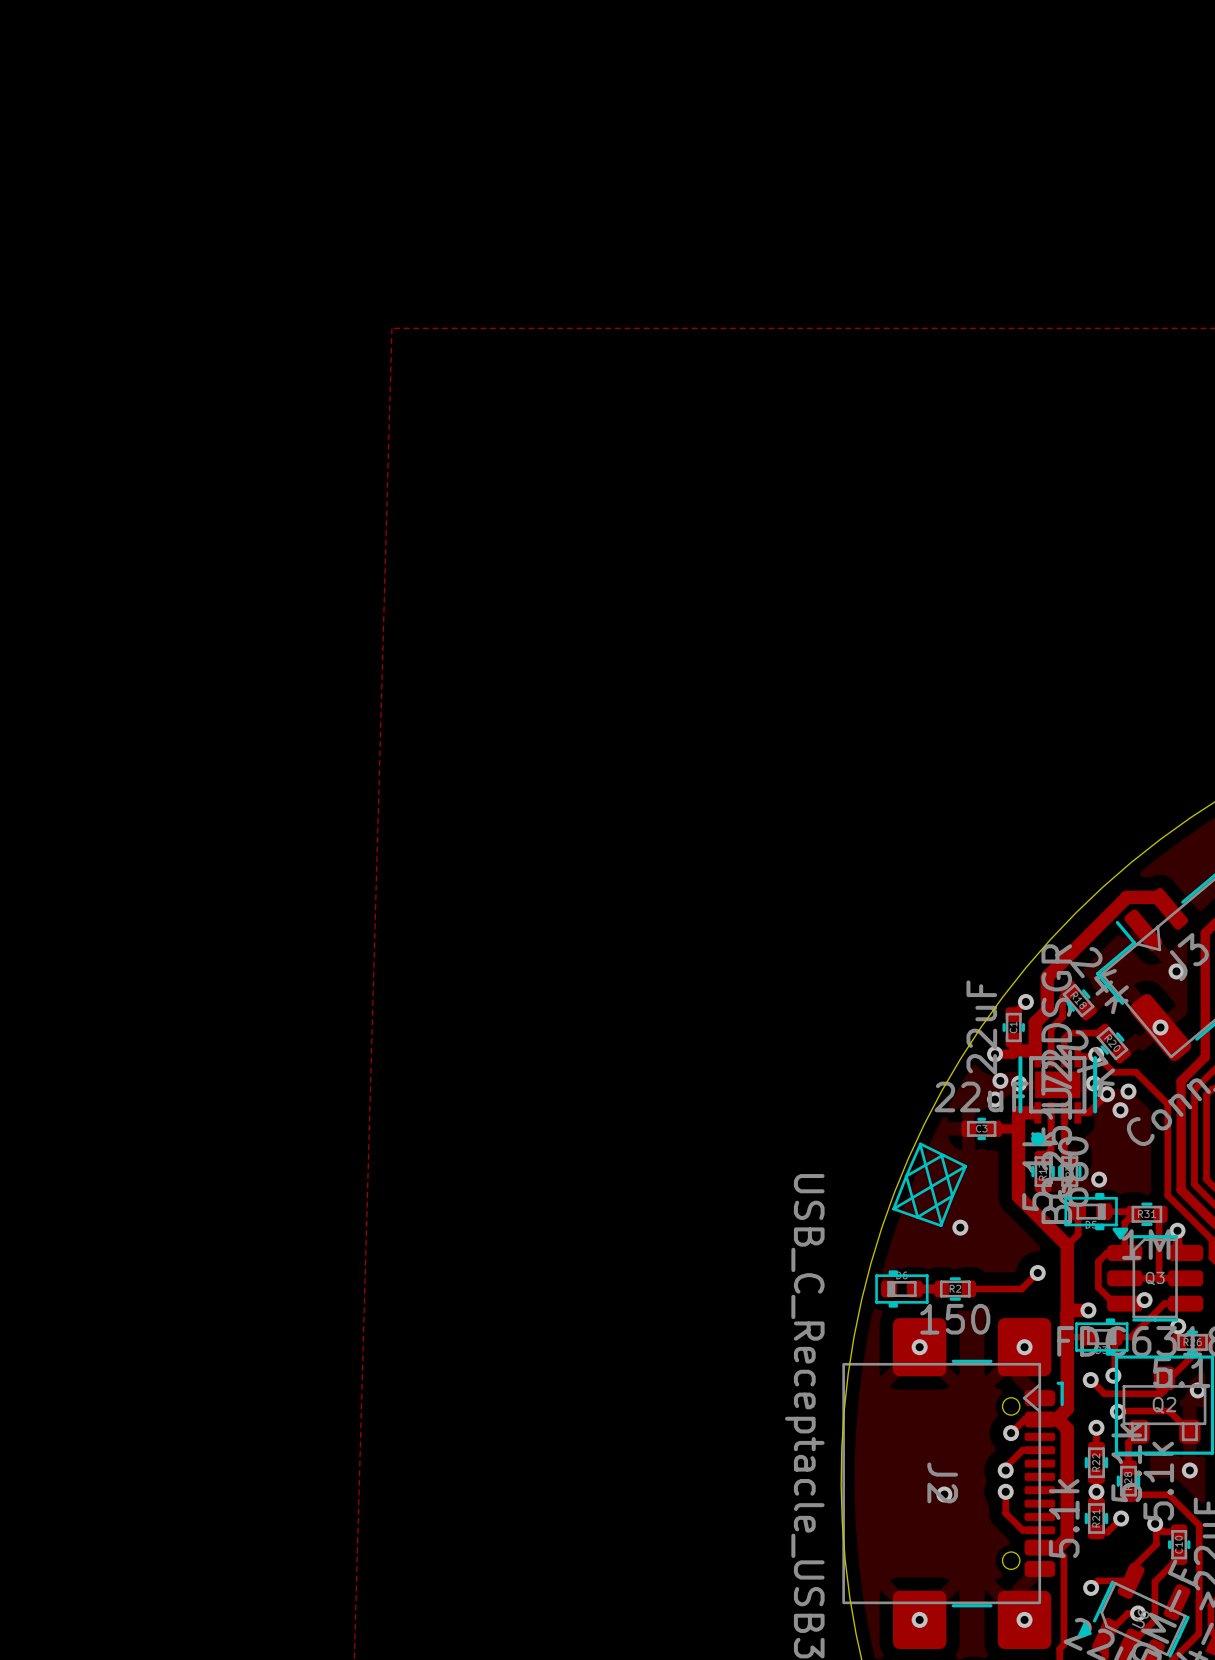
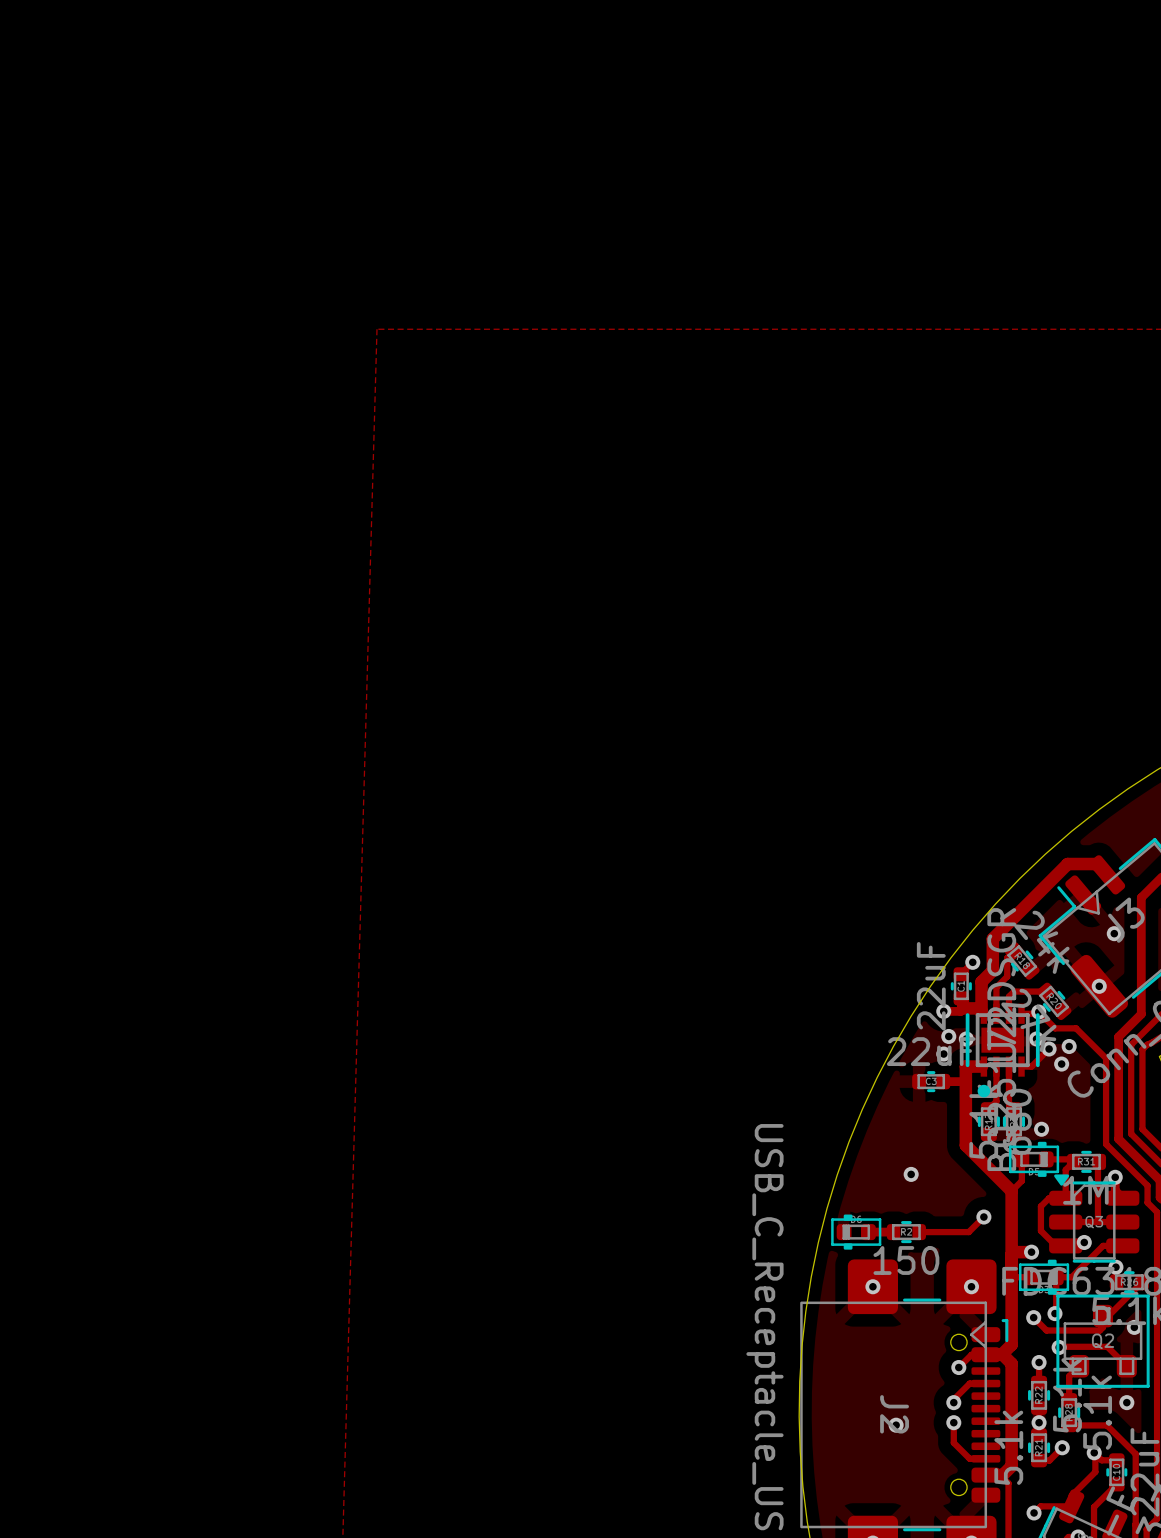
line: (920, 1144) (941, 1224) -> none
line: (941, 1155) (952, 1195) -> none
line: (943, 1155) (906, 1176) (917, 1216) -> none
line: (965, 1166) (920, 1143) (893, 1208) -> none
line: (965, 1166) (893, 1208) -> none
line: (965, 1166) (941, 1225) (893, 1208) -> none
line: (952, 1195) (917, 1217) -> none

